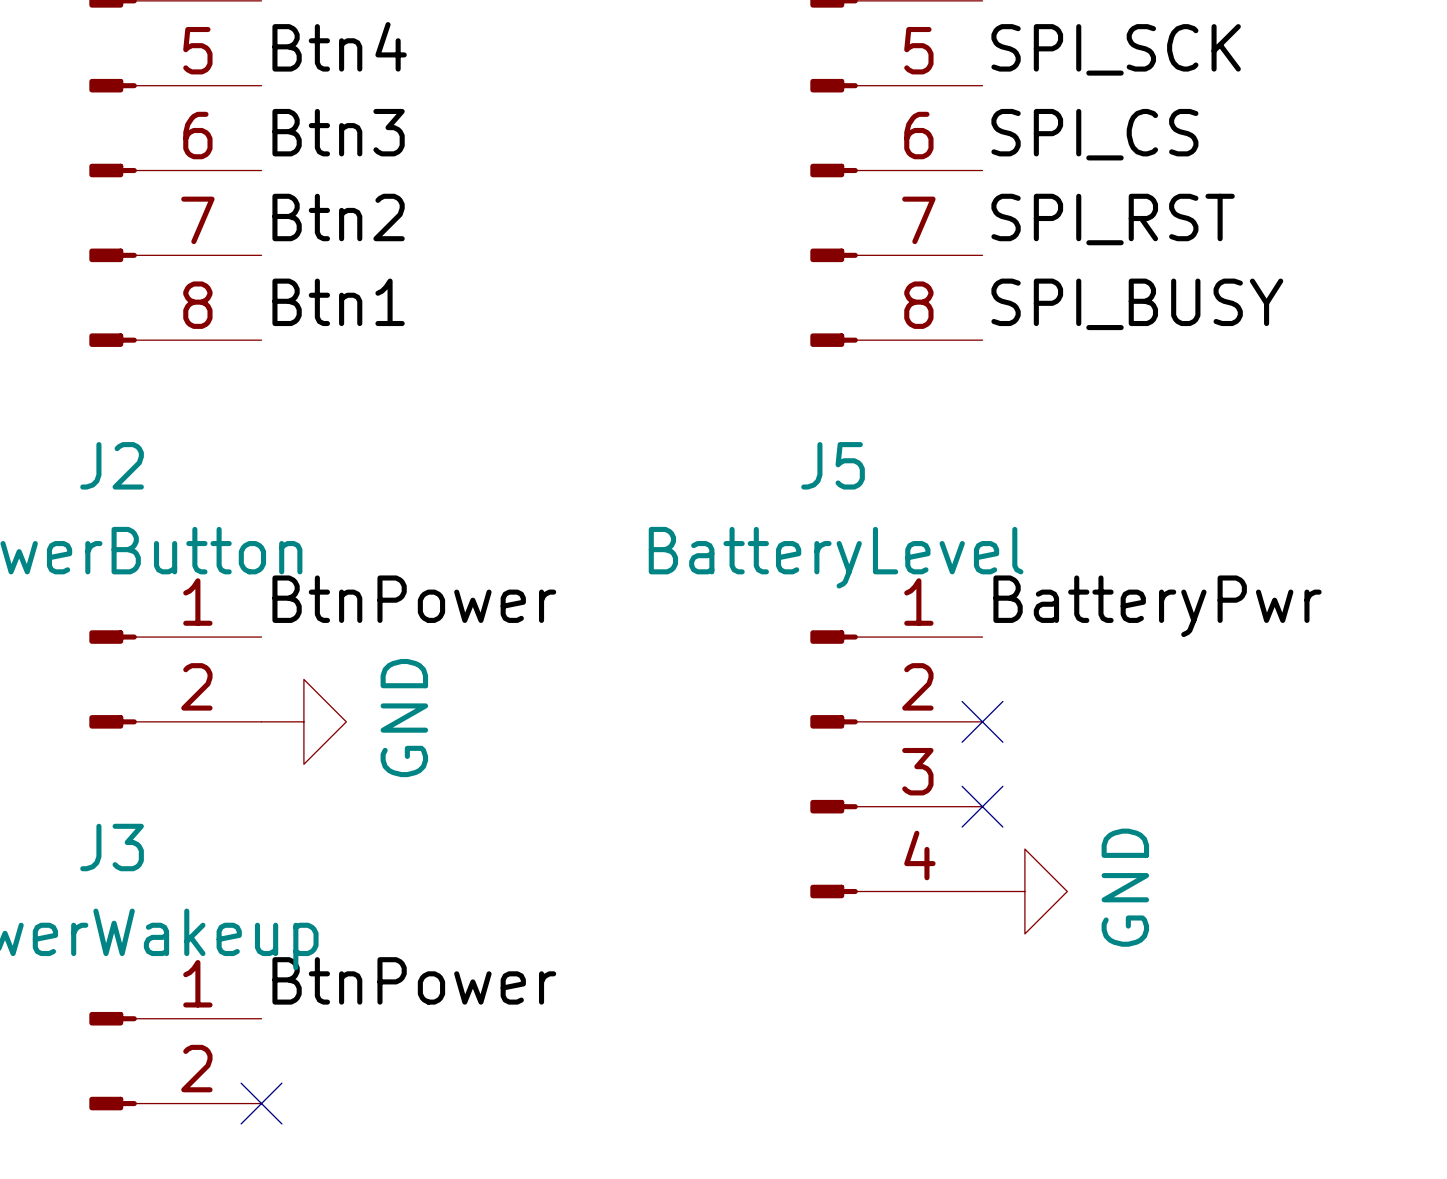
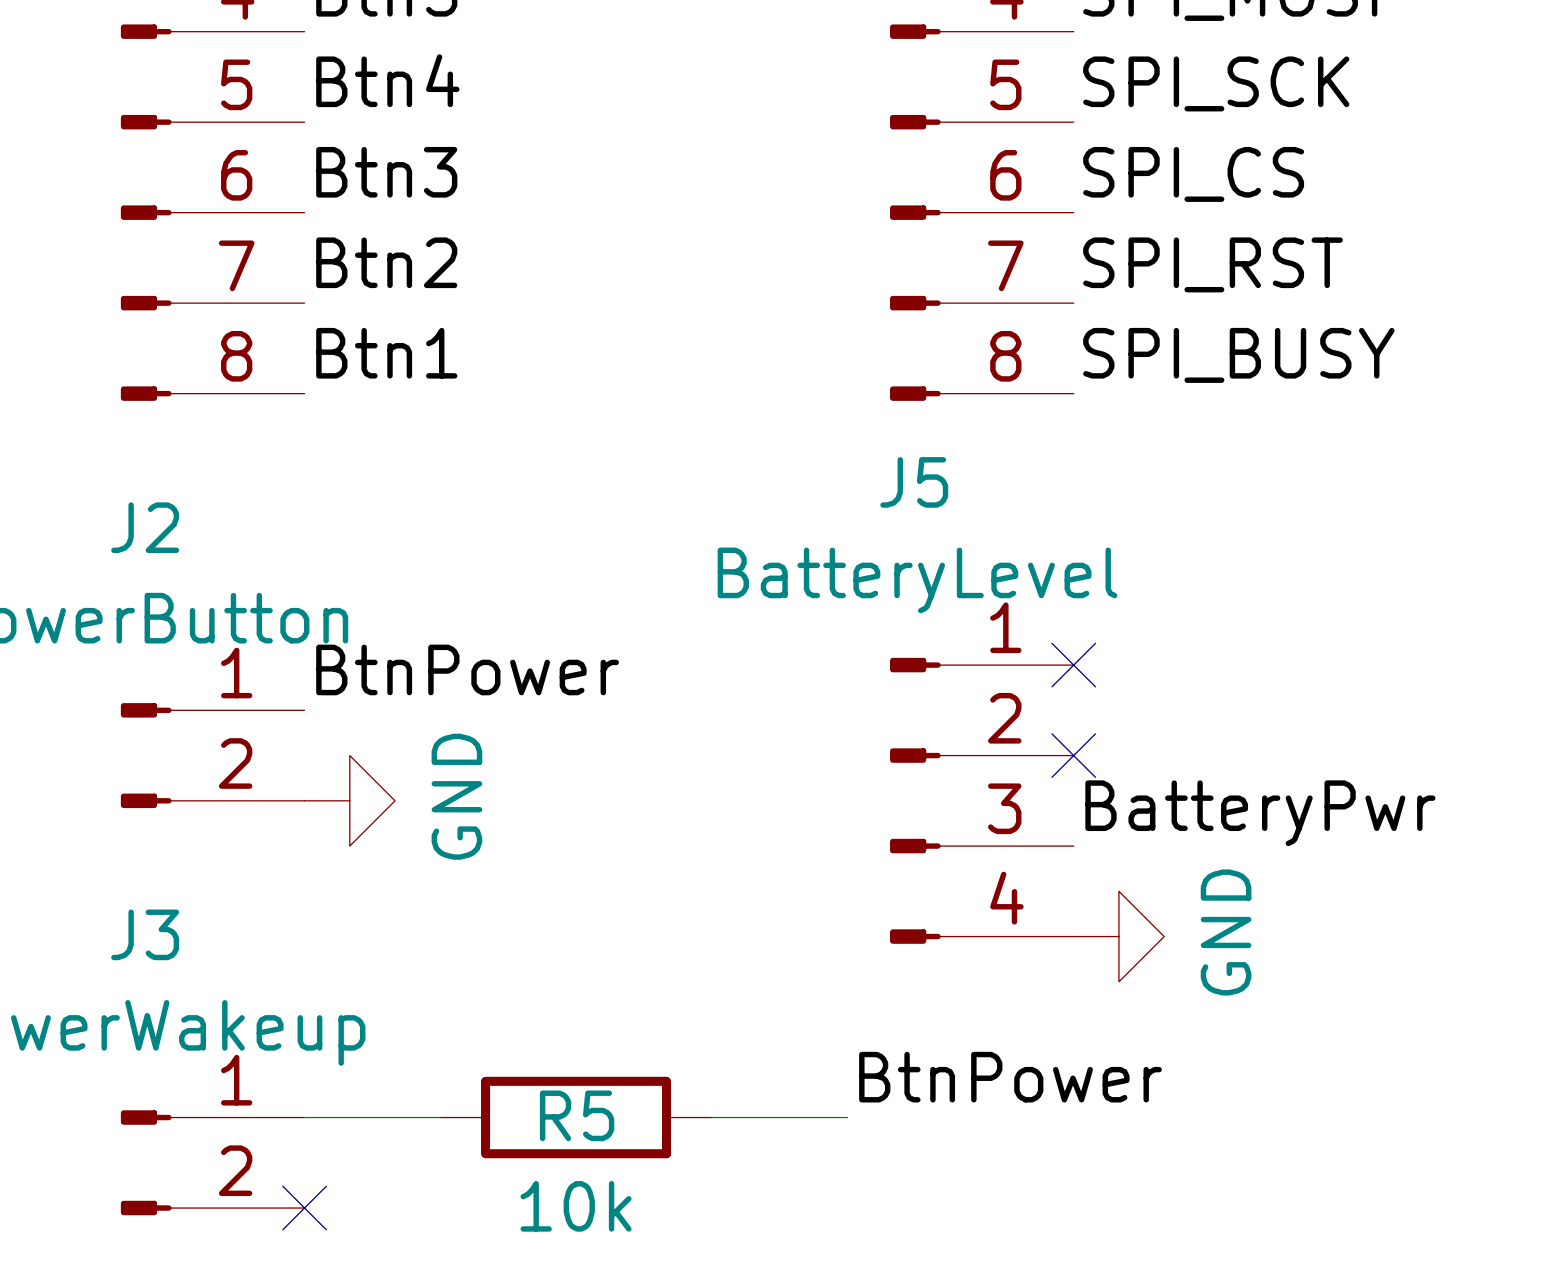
no-connect mark: none -> (1073, 665)
label position: BatteryPwr (1157, 606) -> BatteryPwr (1260, 813)
no-connect mark position: (982, 721) -> (1073, 755)
J5 position: (896, 764) -> (981, 800)
no-connect mark: (982, 806) -> none
power symbol position: GND (1024, 891) -> GND (1118, 936)
label position: BtnPower (414, 980) -> BtnPower (1010, 1077)
wire: none -> (304, 1117) (440, 1117)
R5: none -> 10k (576, 1117)
wire: none -> (711, 1117) (847, 1117)

